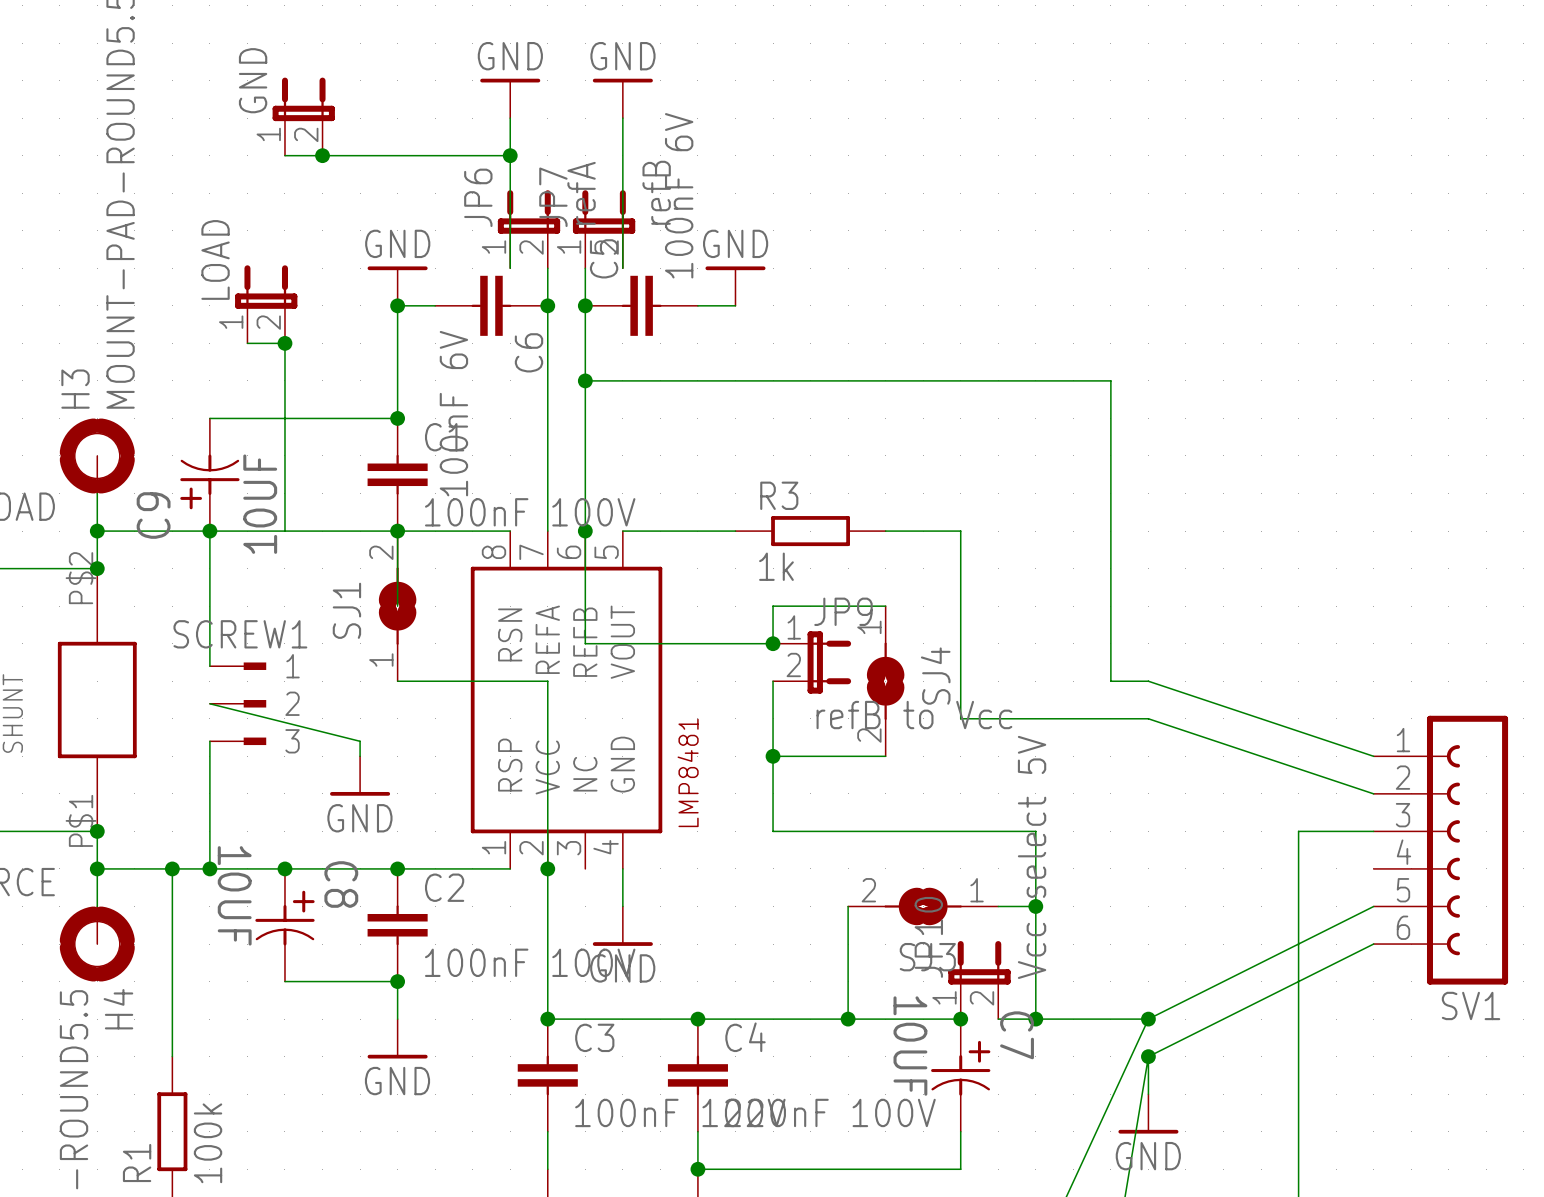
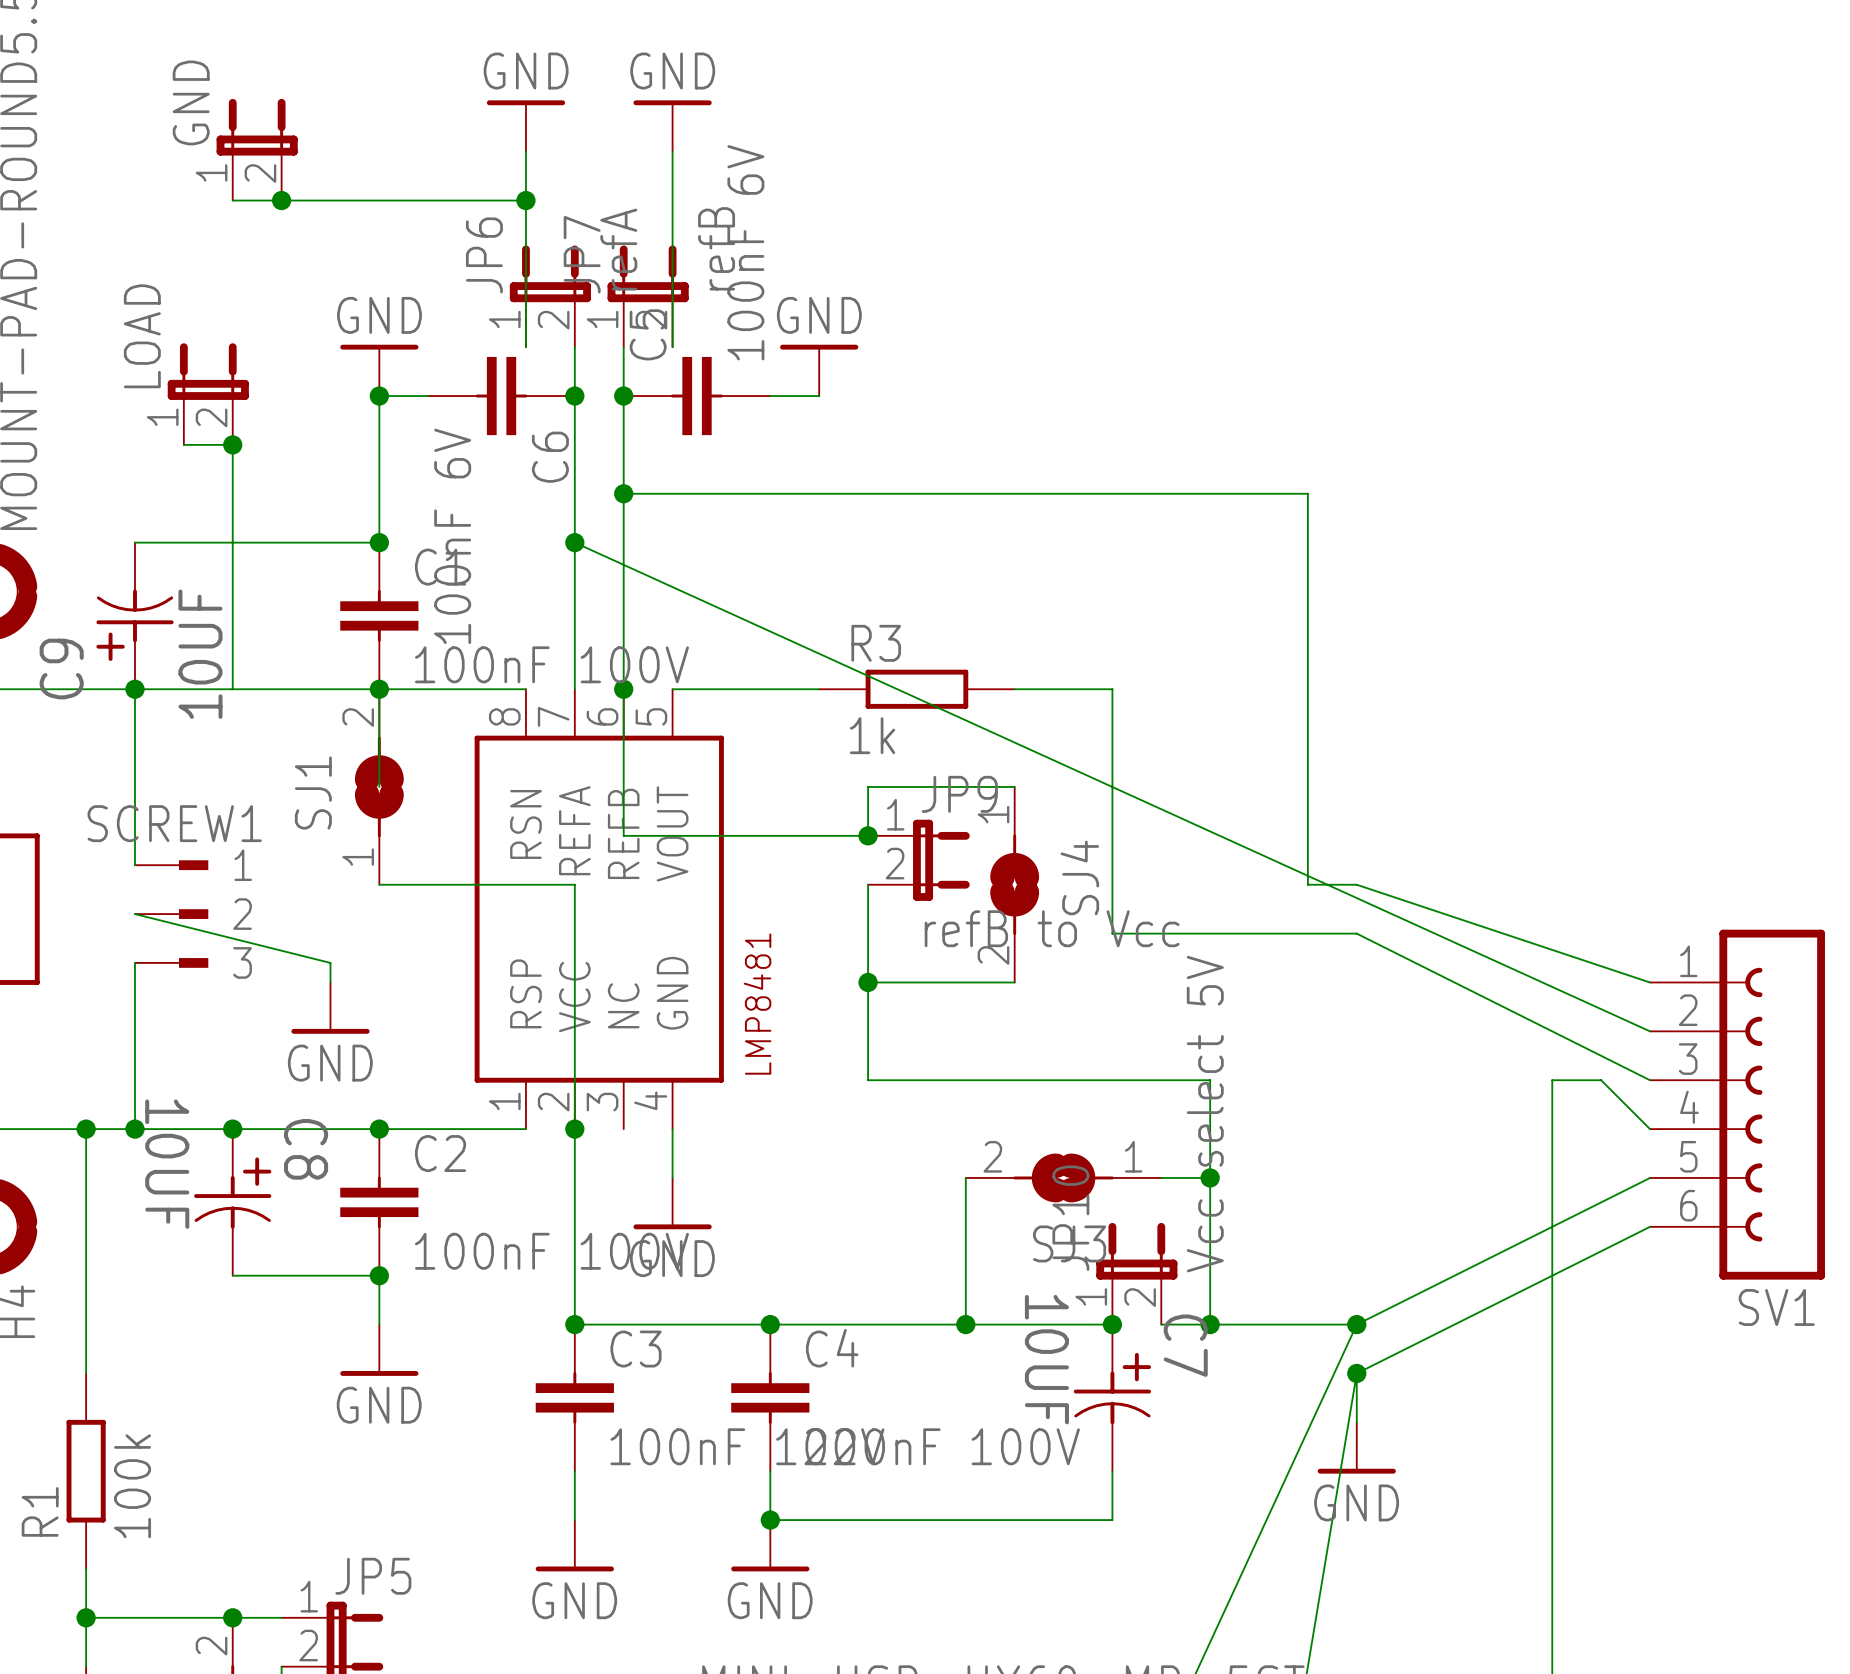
wire: none -> (574, 542) (1650, 1031)
junction: none -> (574, 542)
wire: (1148, 718) (1373, 793) -> (1356, 933) (1650, 1080)
wire: (1336, 831) (1373, 831) -> (1601, 1080) (1650, 1129)

